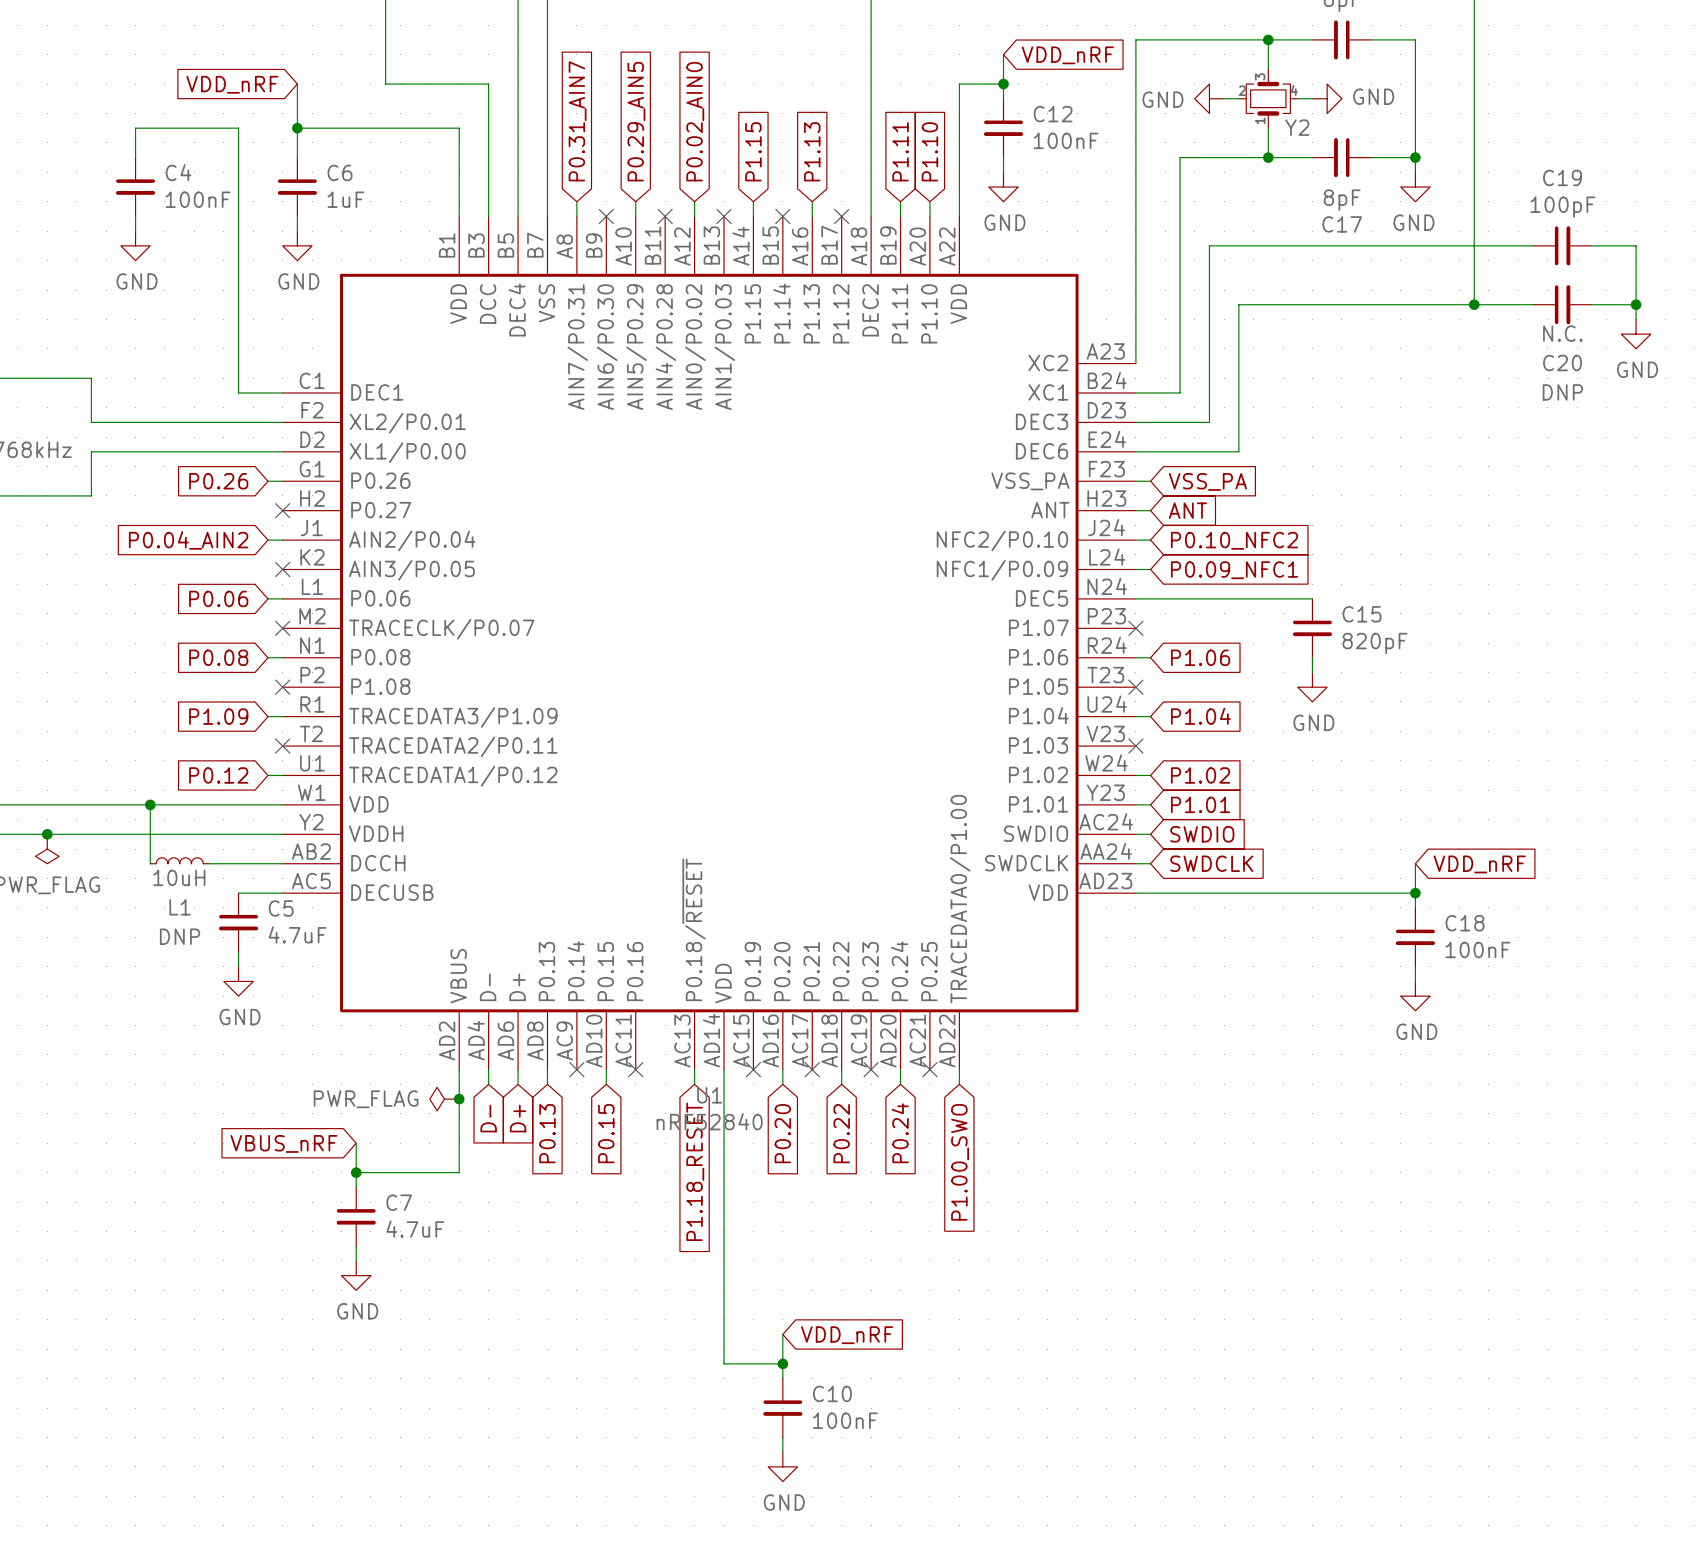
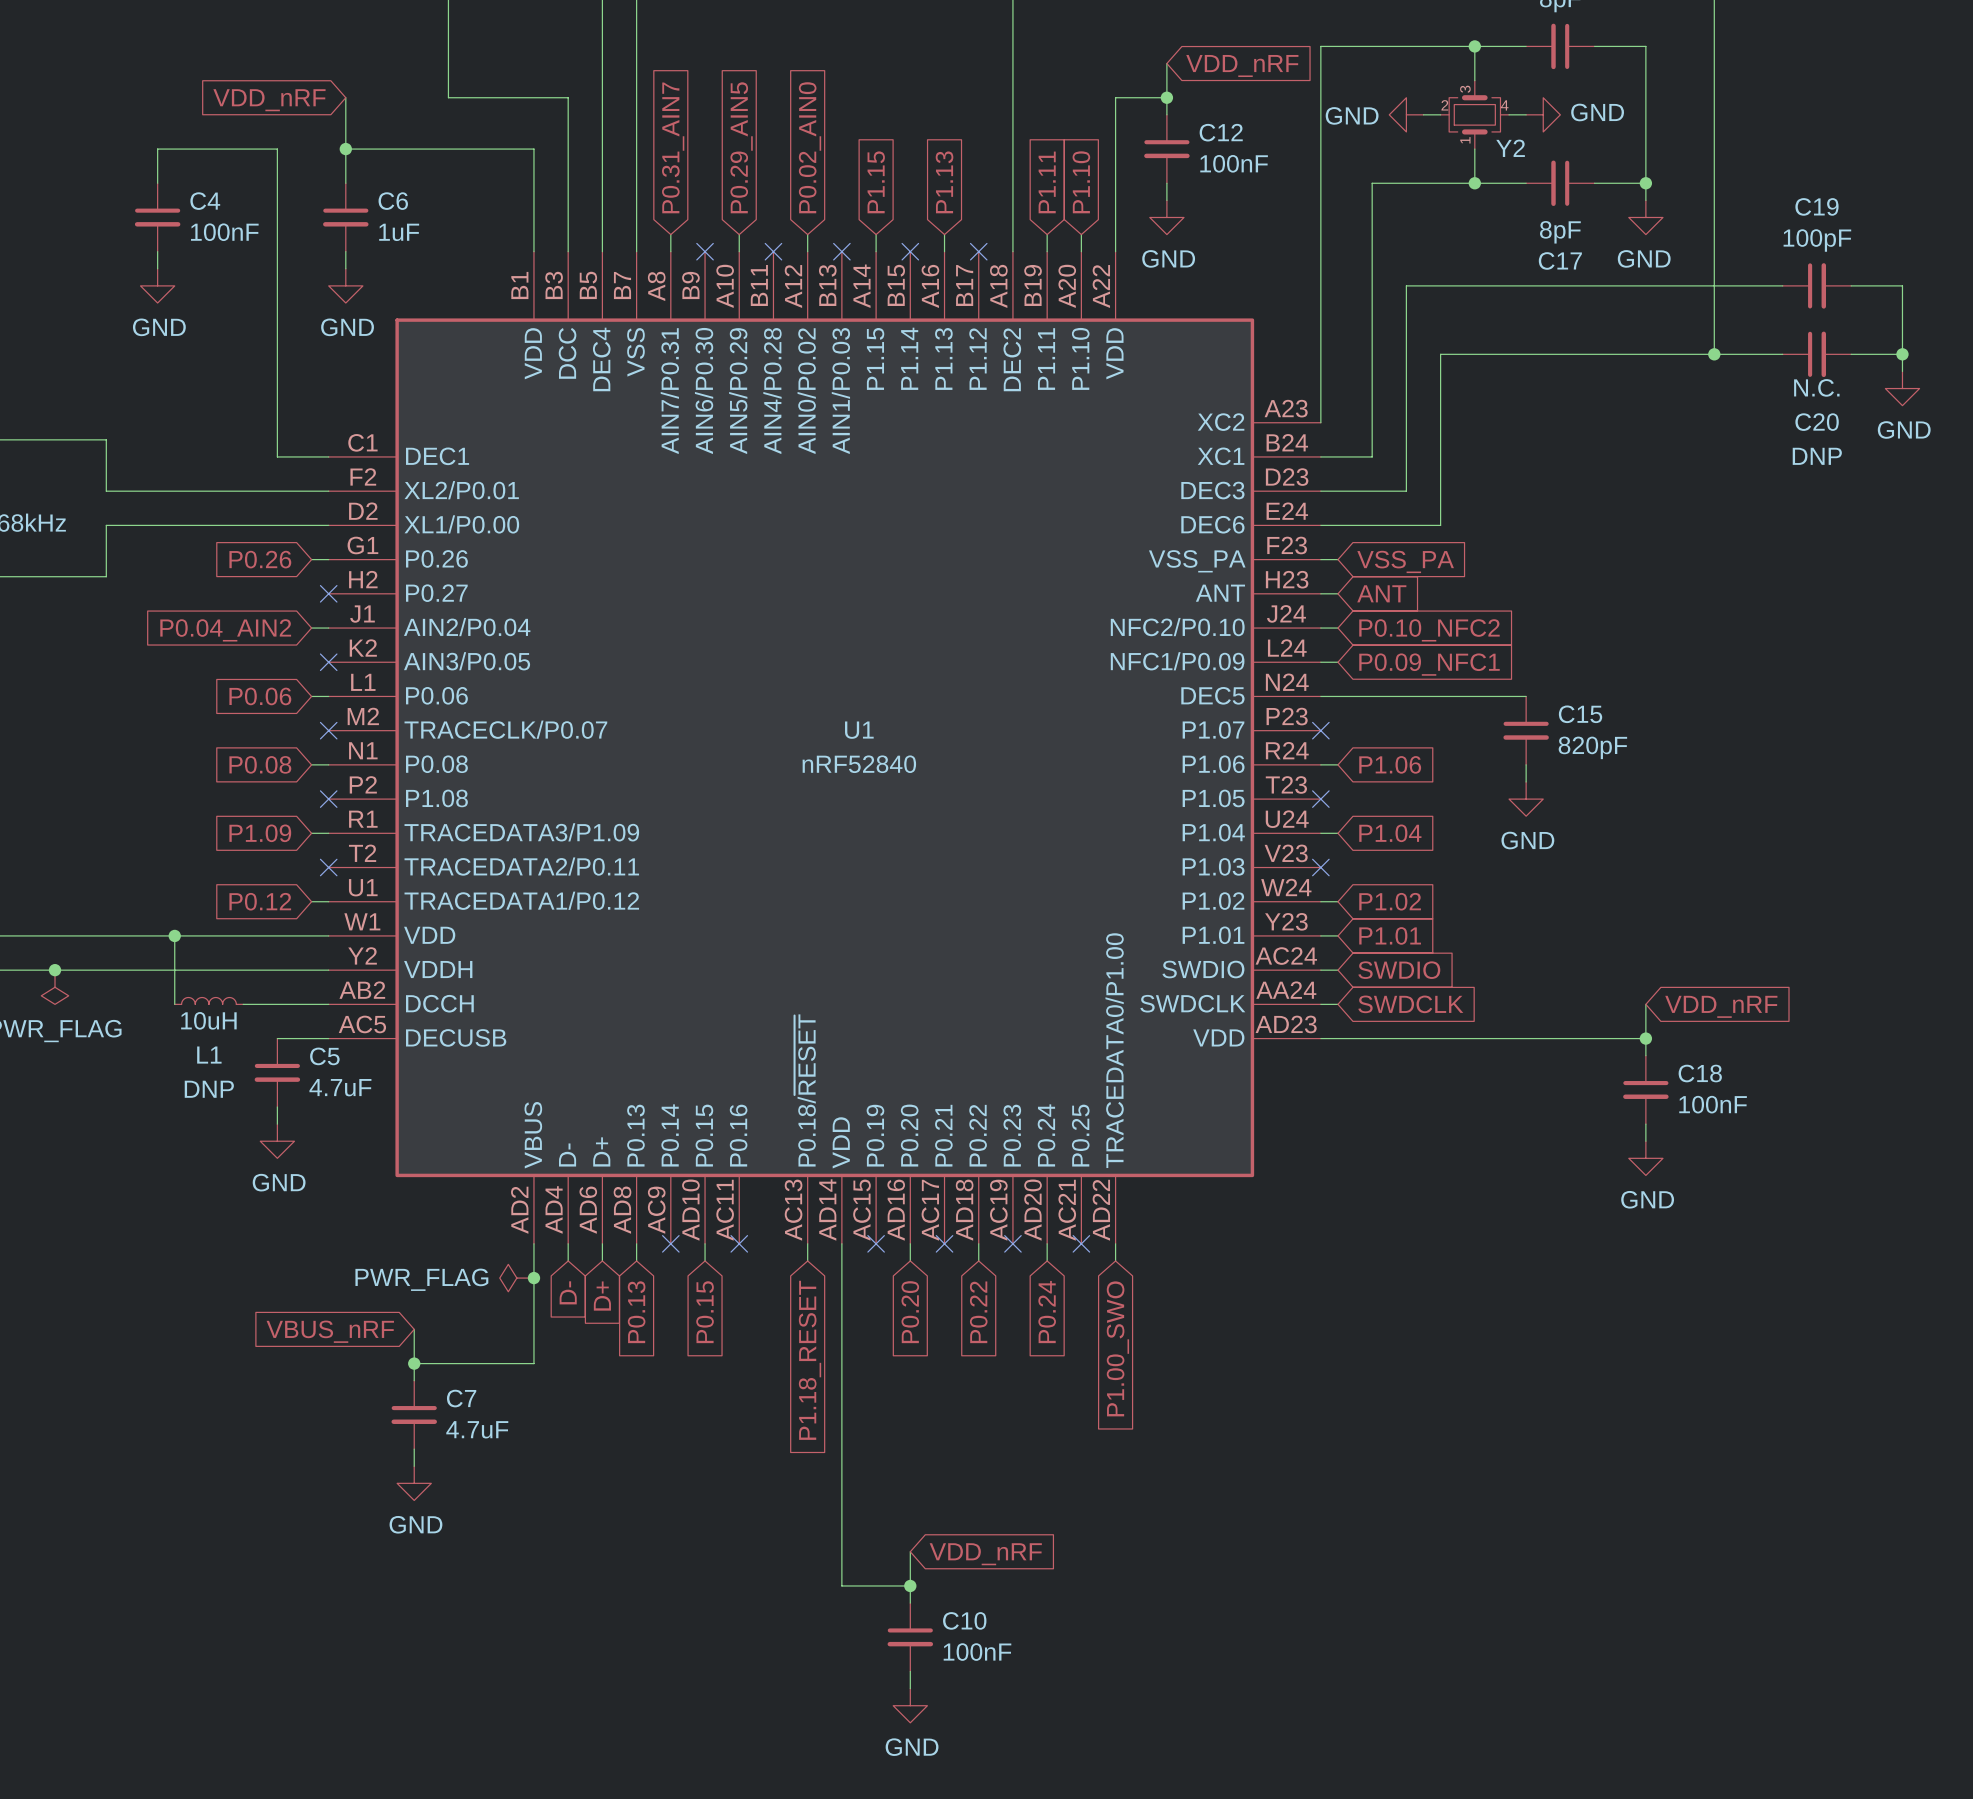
U1 name position: U1 (709, 1095) -> U1 (859, 730)
U1 value position: nRF52840 (709, 1121) -> nRF52840 (859, 764)

